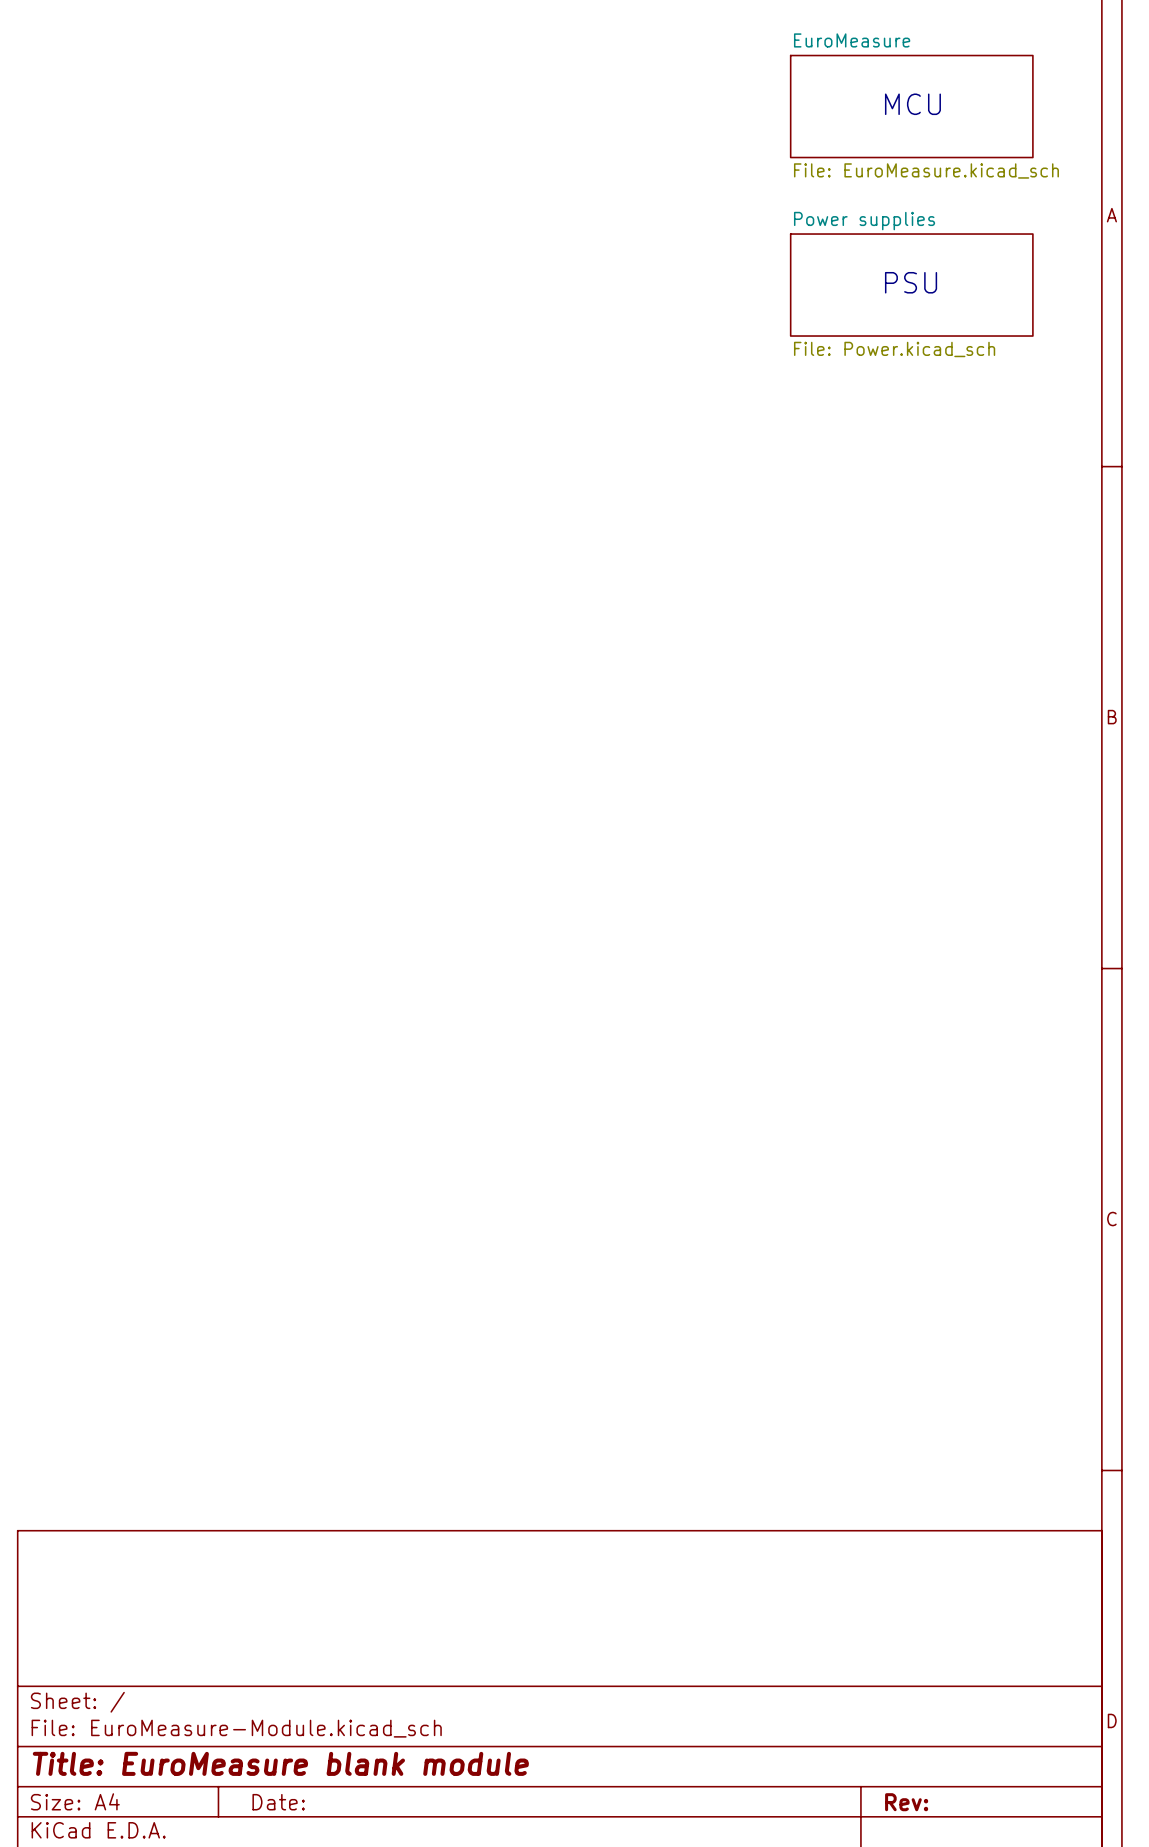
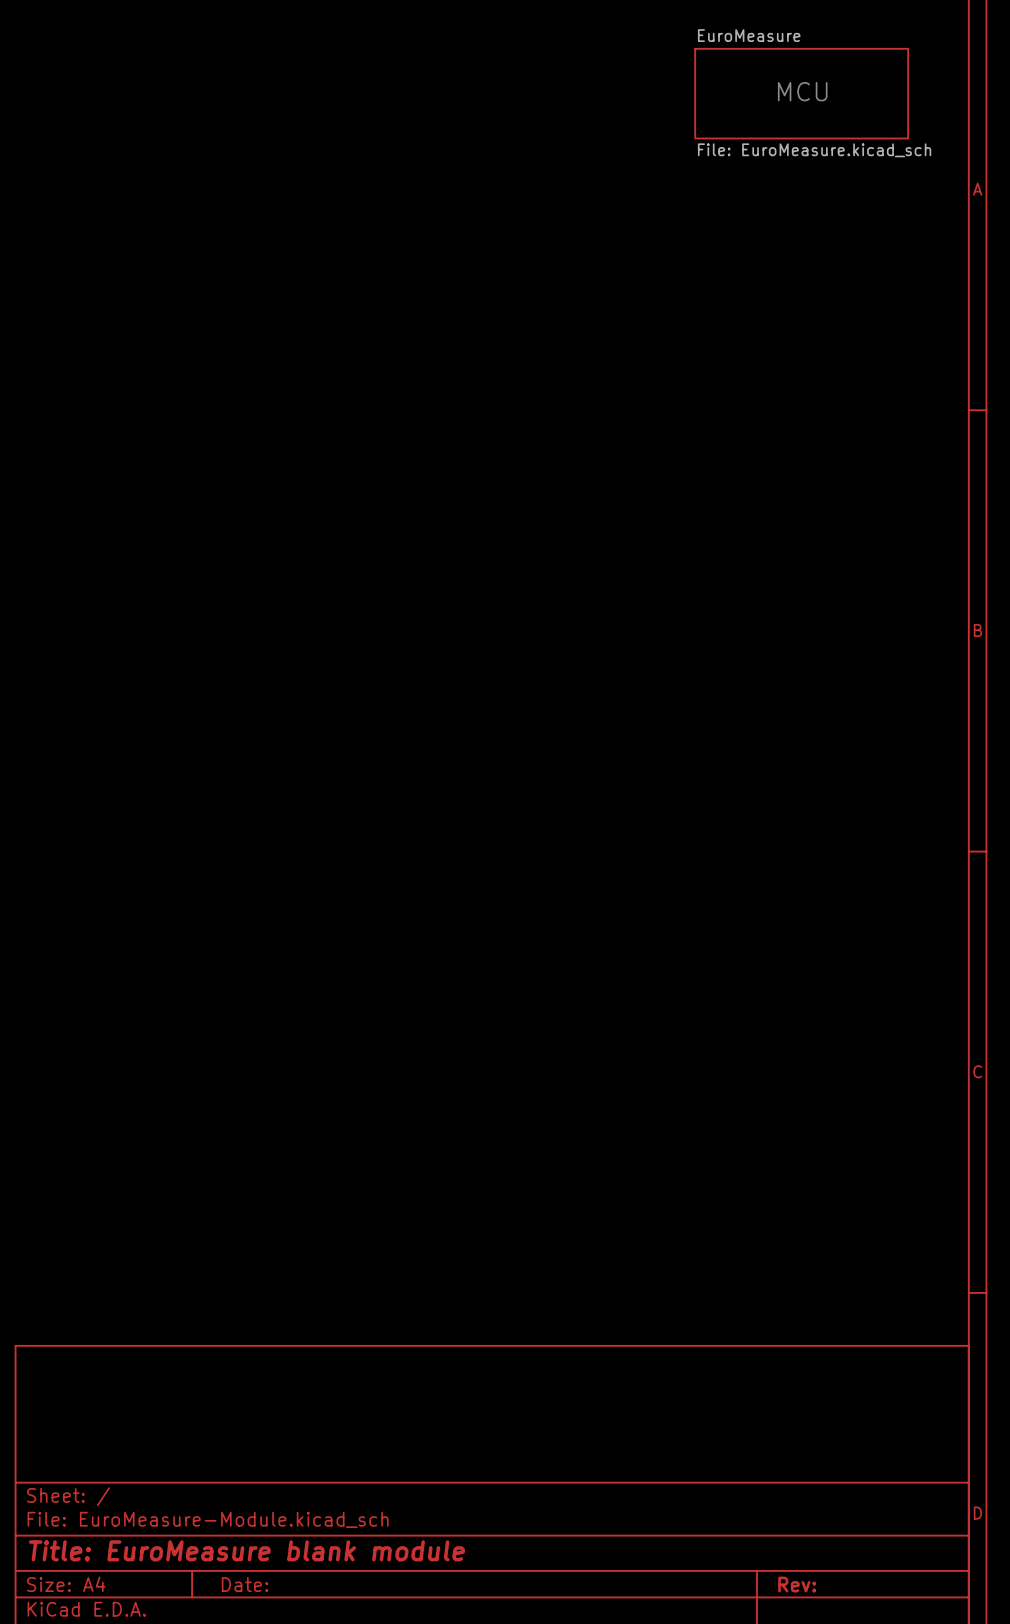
text: PSU (911, 282) -> none
sheet Power supplies: File: Power.kicad_sch (911, 285) -> none

